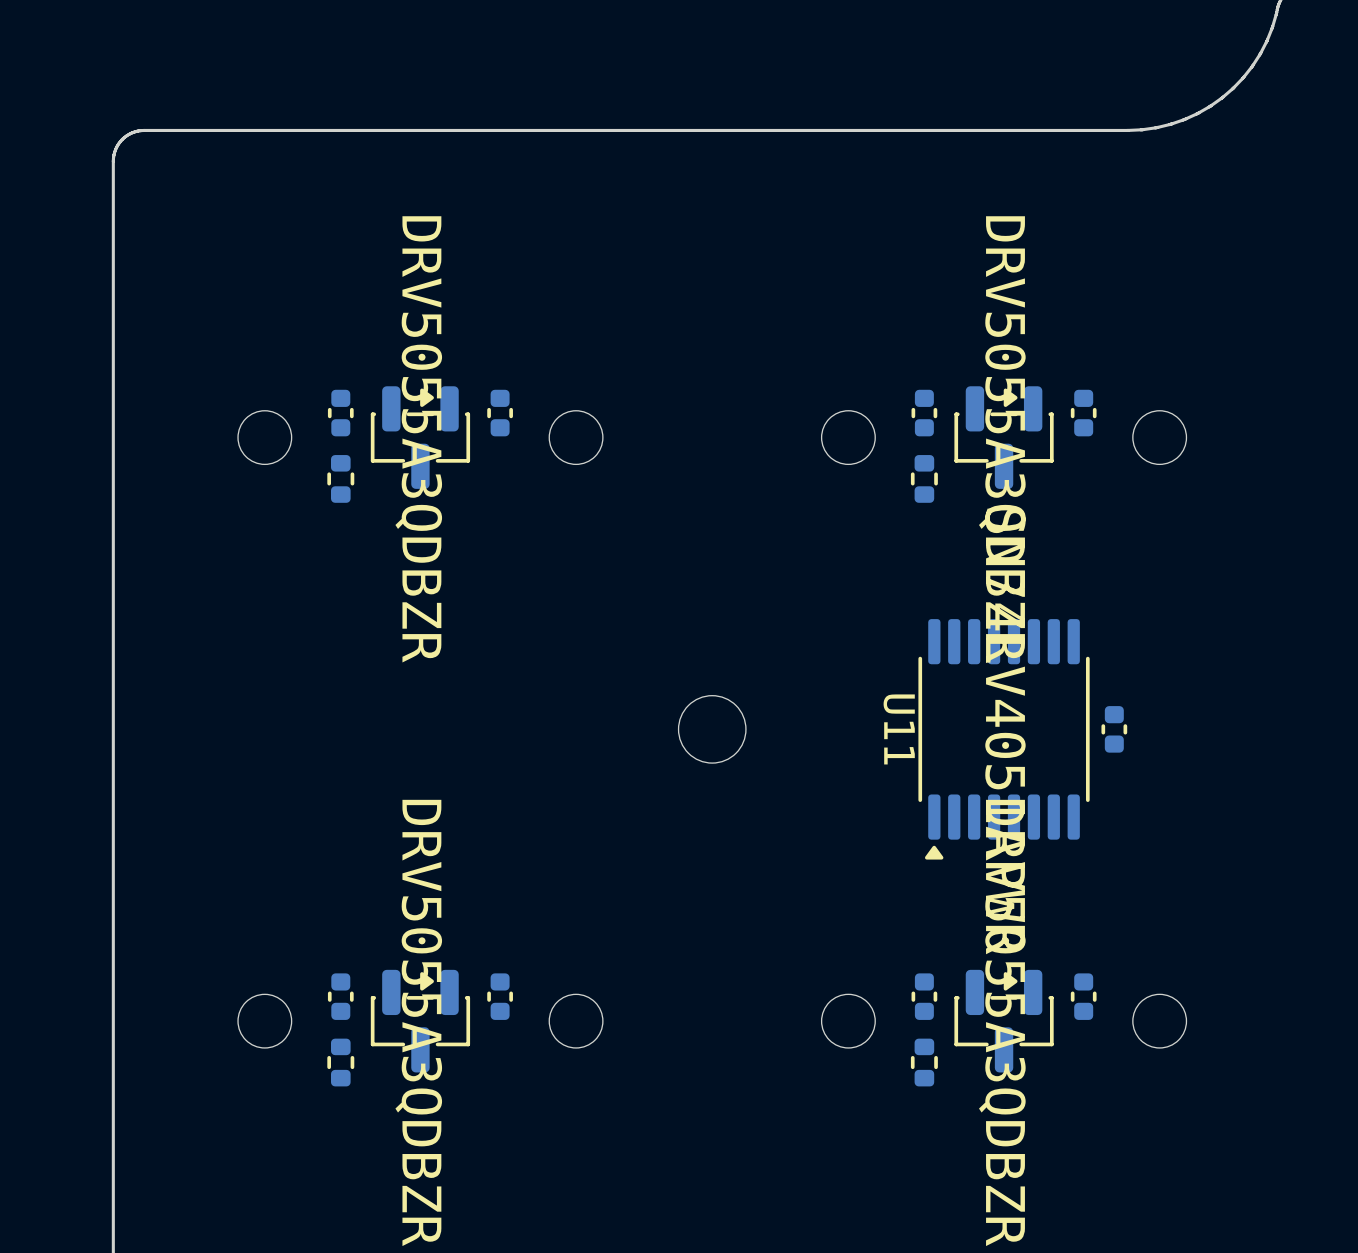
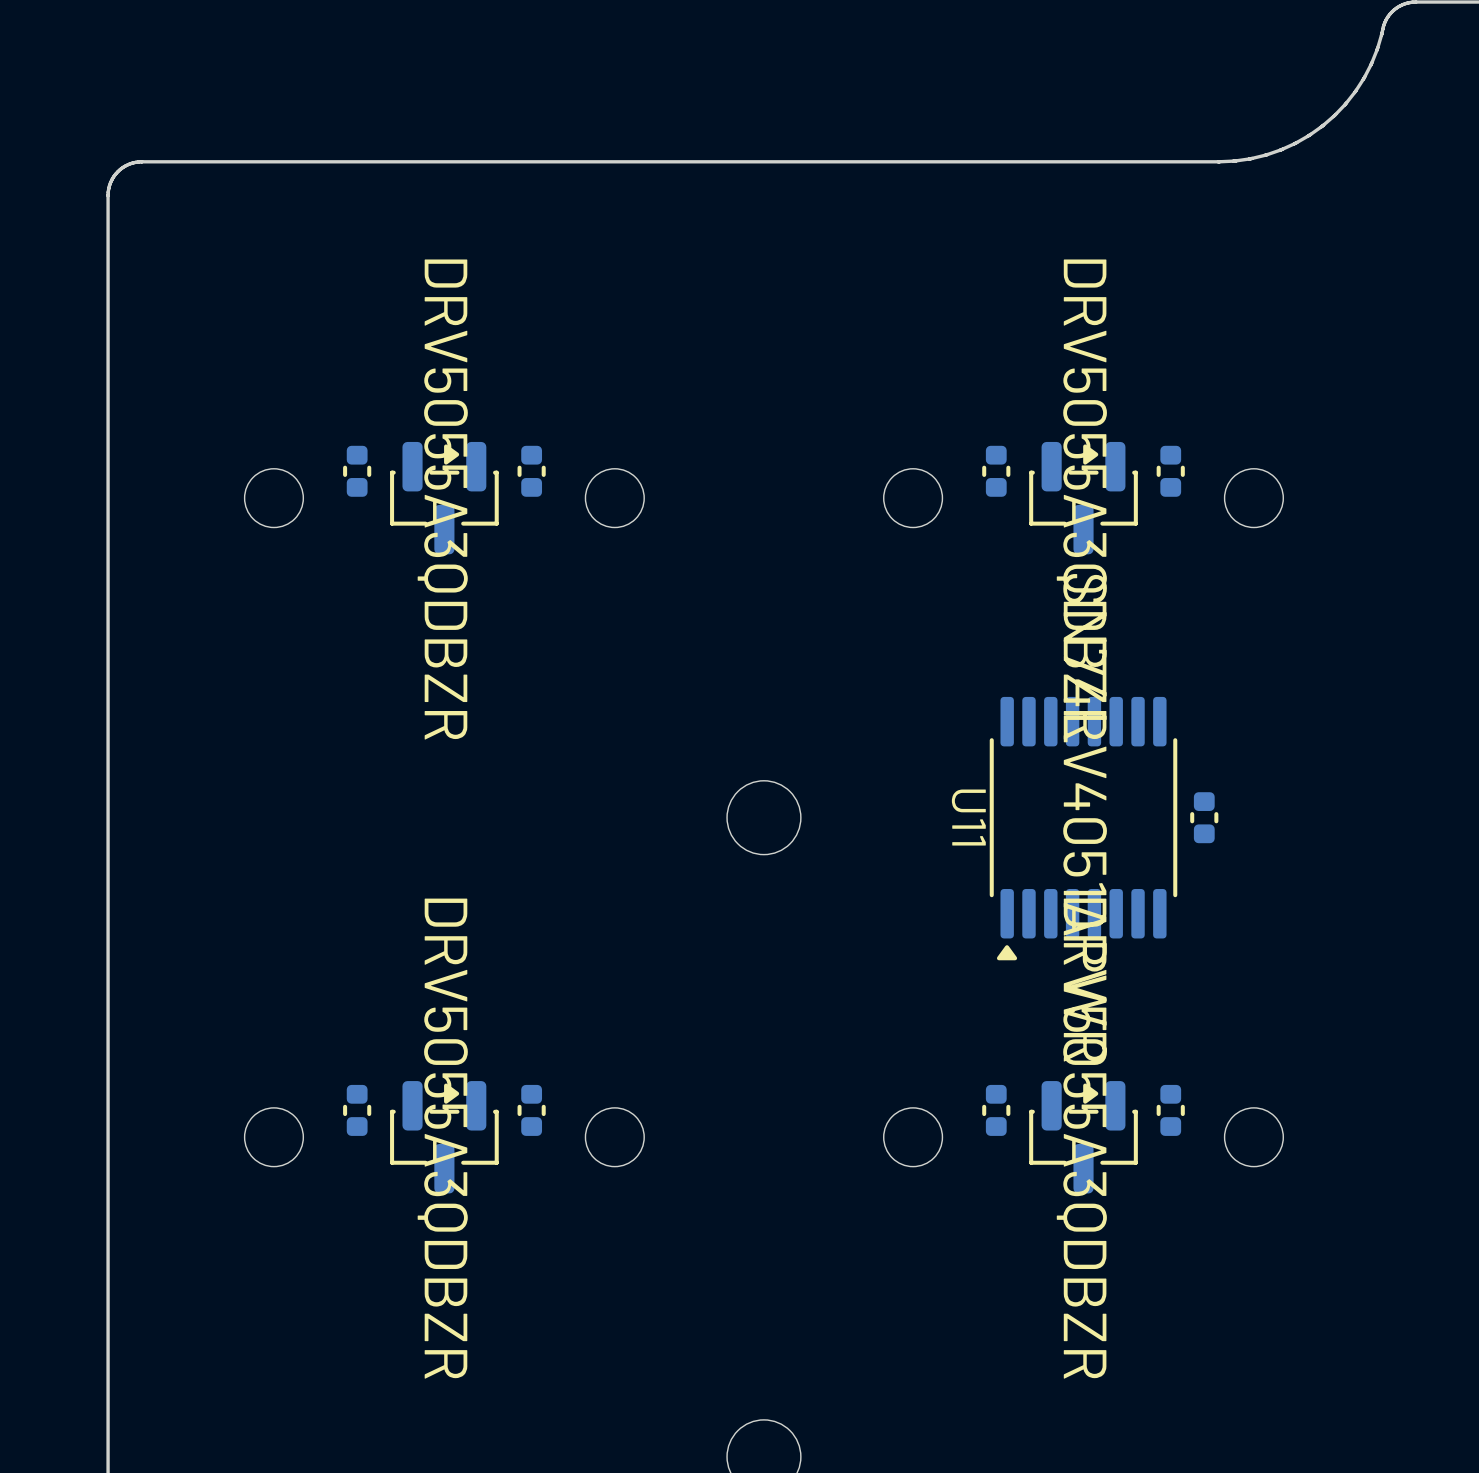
part: (340, 478) -> none
part: (924, 478) -> none
part: (340, 1062) -> none
part: (924, 1062) -> none

